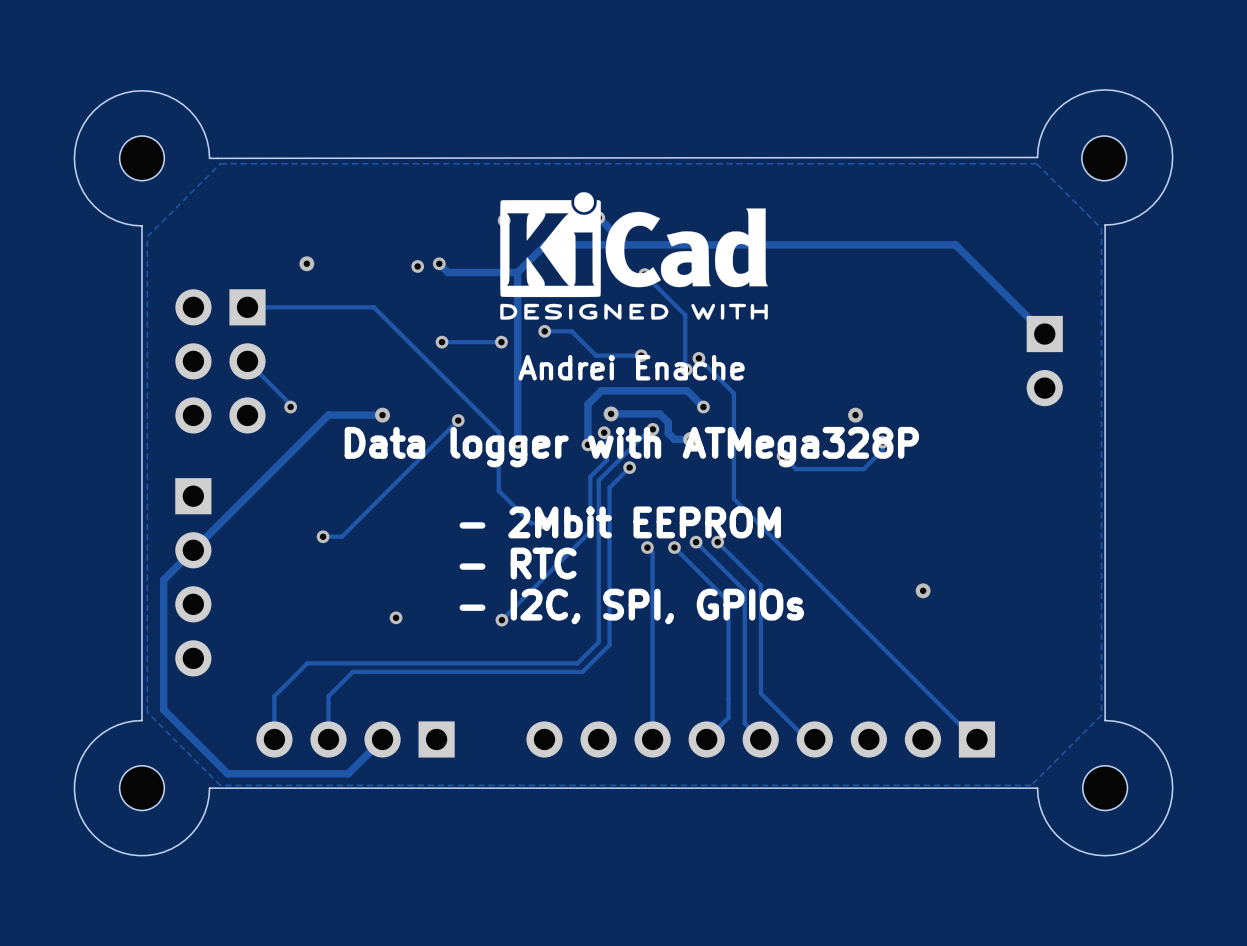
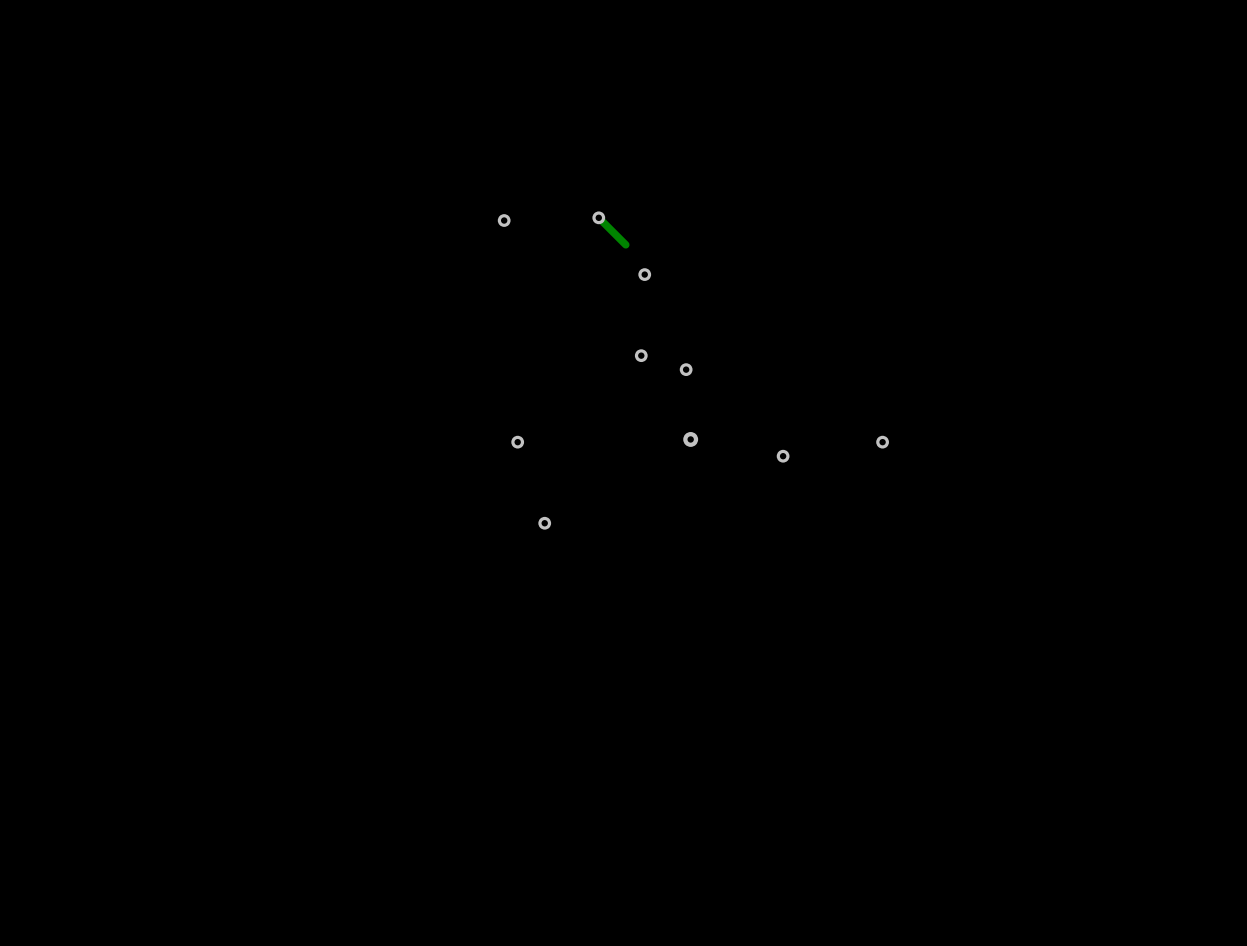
board edge: (1037, 157) (209, 158) (204, 132) (195, 117) (183, 104) (167, 95) (150, 91) (133, 91) (116, 95) (100, 104) (88, 117) (76, 140) (74, 158) (76, 175) (88, 199) (100, 211) (116, 220) (141, 225) (141, 720) (117, 725) (102, 733) (90, 744) (81, 758) (75, 774) (74, 790) (77, 807) (88, 829) (100, 841) (122, 852) (139, 855) (163, 852) (178, 844) (196, 827) (207, 804) (209, 788) (1037, 788) (1039, 805) (1046, 821) (1057, 835) (1079, 850) (1096, 855) (1113, 855) (1130, 850) (1146, 841) (1163, 821) (1170, 805) (1172, 788) (1170, 770) (1163, 754) (1146, 734) (1130, 725) (1105, 720) (1105, 225) (1122, 222) (1138, 216) (1158, 198) (1170, 174) (1172, 148) (1163, 123) (1146, 103) (1122, 92) (1096, 90) (1079, 95) (1057, 109) (1042, 131) (1037, 157) -> none
part: (141, 158) -> none
part: (1104, 158) -> none
zone outline: (1036, 163) (220, 163) (147, 236) (147, 712) (220, 785) (1031, 785) (1101, 715) (1101, 228) (1036, 163) -> none
drawing: [500, 192, 768, 320] -> none
via: (306, 263) -> none
track: (439, 263) (448, 272) (517, 272) -> none
via: (439, 263) -> none
via: (417, 266) -> none
track: (517, 272) (517, 442) -> none
track: (517, 272) (545, 244) (955, 244) (1044, 334) -> none
track: (644, 274) (685, 315) (686, 369) -> none
track: (247, 307) (373, 307) (498, 432) (498, 490) (531, 523) (544, 523) -> none
track: (544, 331) (571, 331) (596, 355) (641, 355) -> none
via: (544, 331) -> none
via: (442, 342) -> none
track: (501, 342) (442, 342) -> none
via: (501, 342) -> none
track: (698, 358) (733, 393) (733, 498) (974, 739) (976, 739) -> none
via: (698, 358) -> none
part: (220, 361) -> none
track: (247, 361) (290, 404) (290, 407) -> none
part: (1044, 361) -> none
text: Andrei Enache (631, 367) -> none
via: (290, 407) -> none
track: (703, 407) (687, 390) (601, 390) (587, 404) (587, 444) -> none
via: (703, 407) -> none
track: (611, 413) (659, 413) (668, 422) (668, 433) (674, 439) (690, 439) -> none
via: (611, 413) -> none
track: (382, 415) (328, 415) (163, 580) (163, 709) (227, 773) (348, 773) (382, 739) -> none
via: (382, 415) -> none
via: (855, 415) -> none
track: (458, 420) (342, 536) (323, 536) -> none
via: (458, 420) -> none
track: (652, 429) (649, 429) (598, 480) (598, 642) (577, 663) (307, 663) (274, 696) (274, 739) -> none
via: (652, 429) -> none
track: (604, 432) (606, 435) (606, 460) (590, 476) (590, 531) (501, 620) -> none
via: (604, 432) -> none
track: (882, 442) (882, 450) (863, 469) (796, 469) (783, 456) -> none
via: (587, 444) -> none
text: Data logger with ATMega328P (631, 447) -> none
track: (629, 467) (609, 487) (609, 644) (582, 671) (352, 671) (328, 696) (328, 739) -> none
via: (629, 467) -> none
text: - 2Mbit EEPROM (620, 522) -> none
via: (323, 536) -> none
track: (696, 542) (744, 590) (744, 723) (760, 739) -> none
via: (696, 542) -> none
track: (717, 542) (760, 585) (760, 693) (806, 739) (814, 739) -> none
via: (717, 542) -> none
track: (647, 547) (652, 552) (652, 739) -> none
via: (647, 547) -> none
track: (674, 547) (728, 601) (728, 717) (706, 739) -> none
via: (674, 547) -> none
text: - RTC (518, 563) -> none
part: (193, 577) -> none
via: (923, 590) -> none
text: - I2C, SPI, GPIOs (631, 606) -> none
via: (396, 617) -> none
via: (501, 620) -> none
part: (355, 739) -> none
part: (760, 739) -> none
part: (141, 788) -> none
part: (1105, 788) -> none

